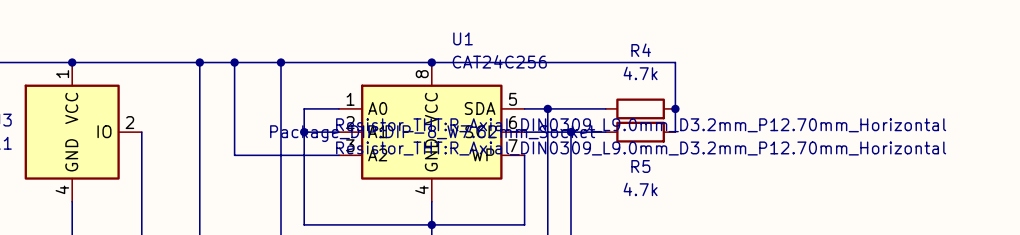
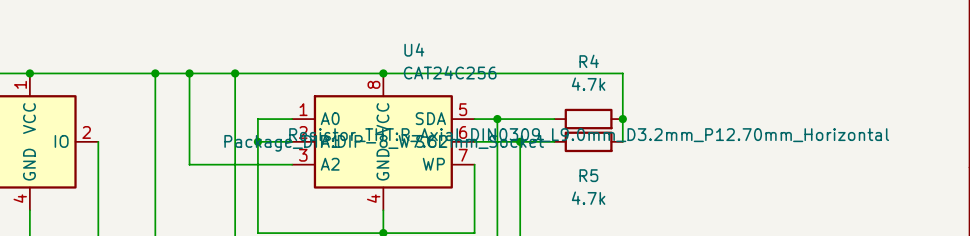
U1 name: U1 (463, 38) -> U4 (414, 49)
R5 text: Resistor_THT:R_Axial_DIN0309_L9.0mm_D3.2mm_P12.70mm_Horizontal (641, 148) -> none

